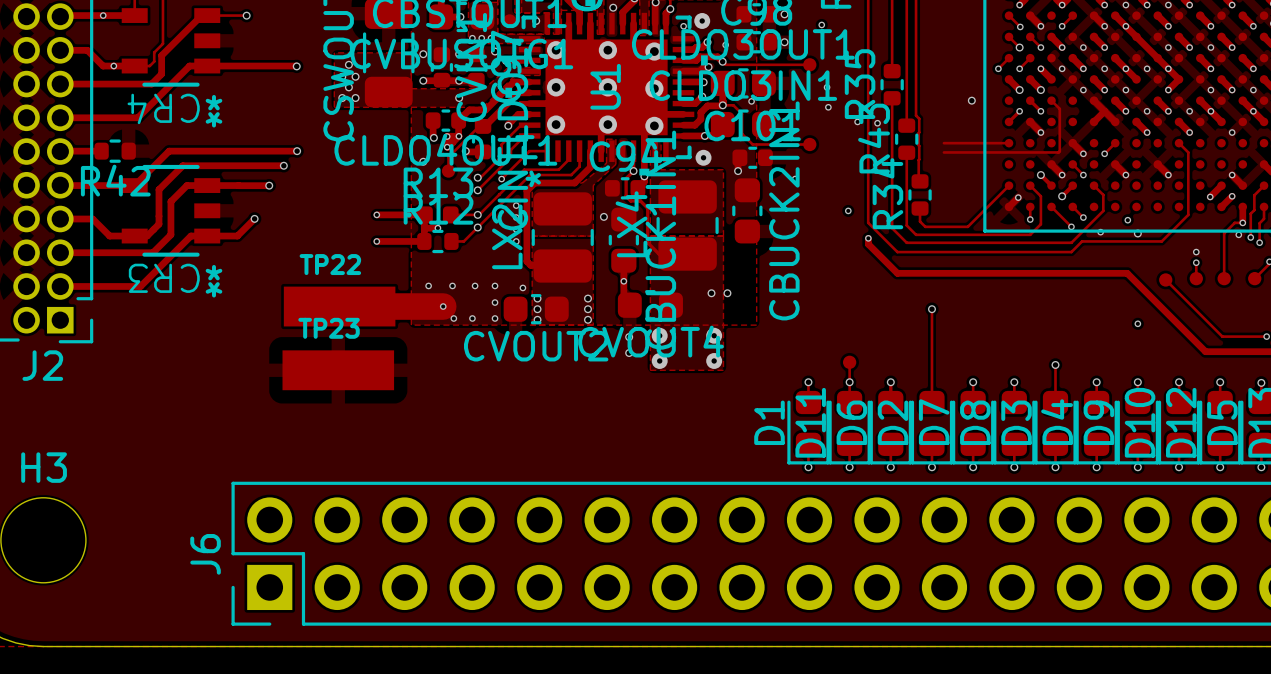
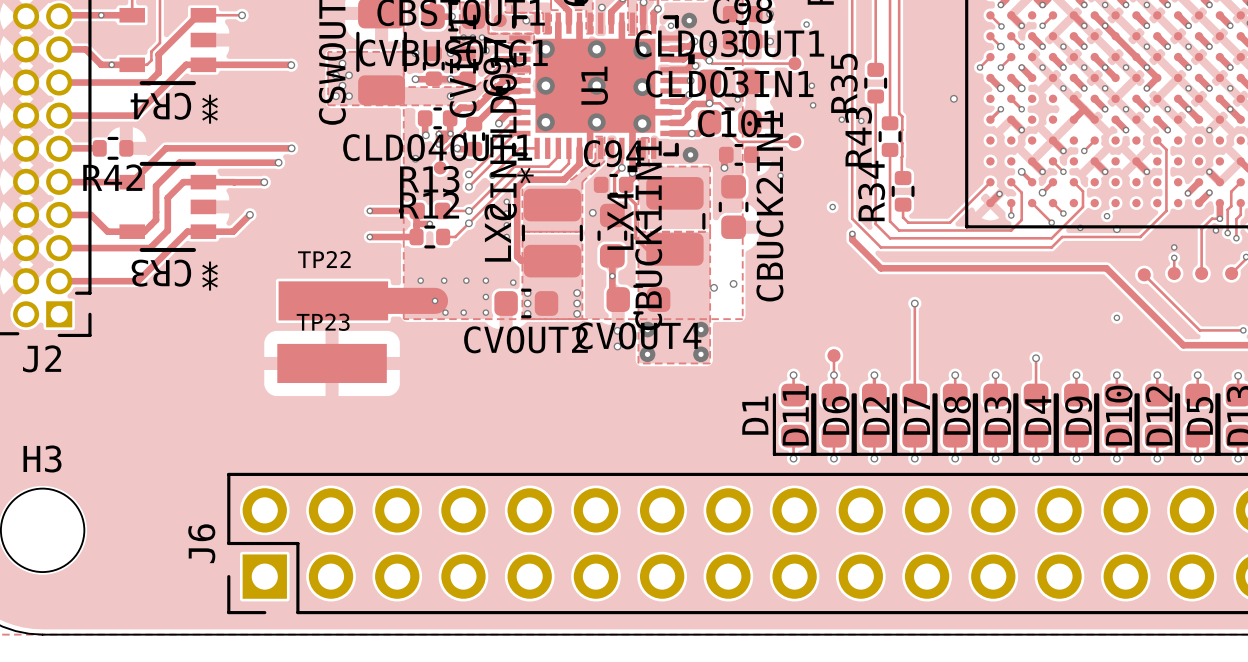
track: (1051, 100) (1059, 108) (1058, 152) (943, 152) -> none
track: (943, 143) (1009, 143) -> none
via position: (711, 293) -> (733, 283)

